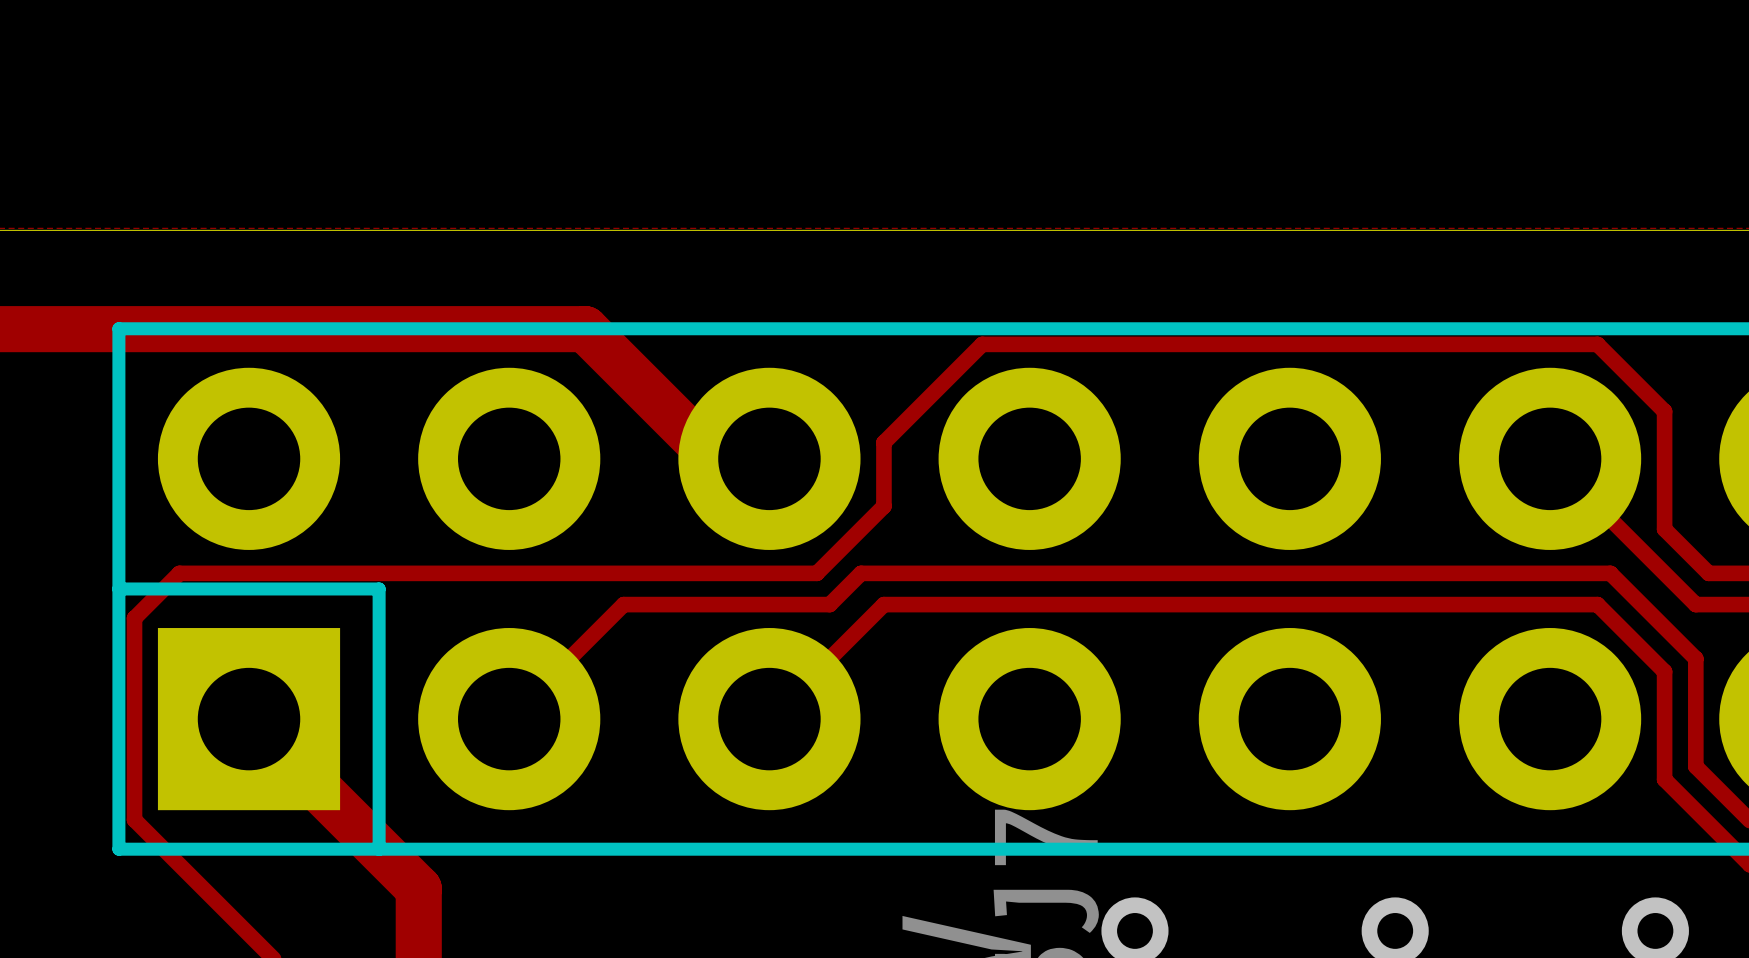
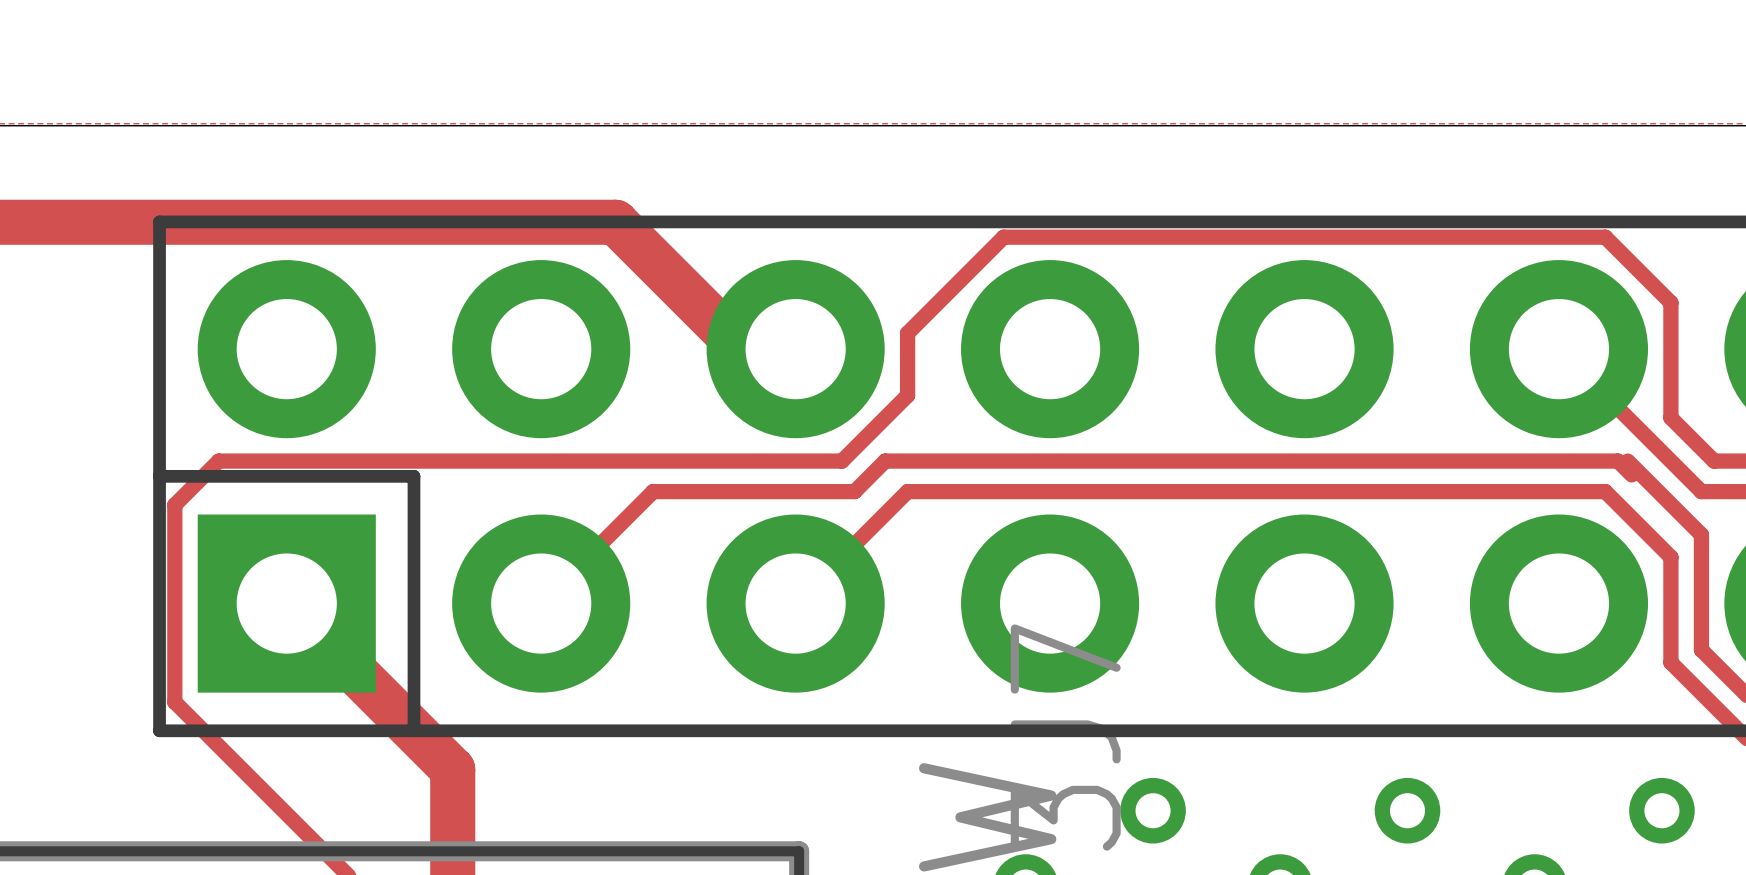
track: (1624, 587) (1695, 658) -> (1627, 461) (1701, 534) (1701, 544)

